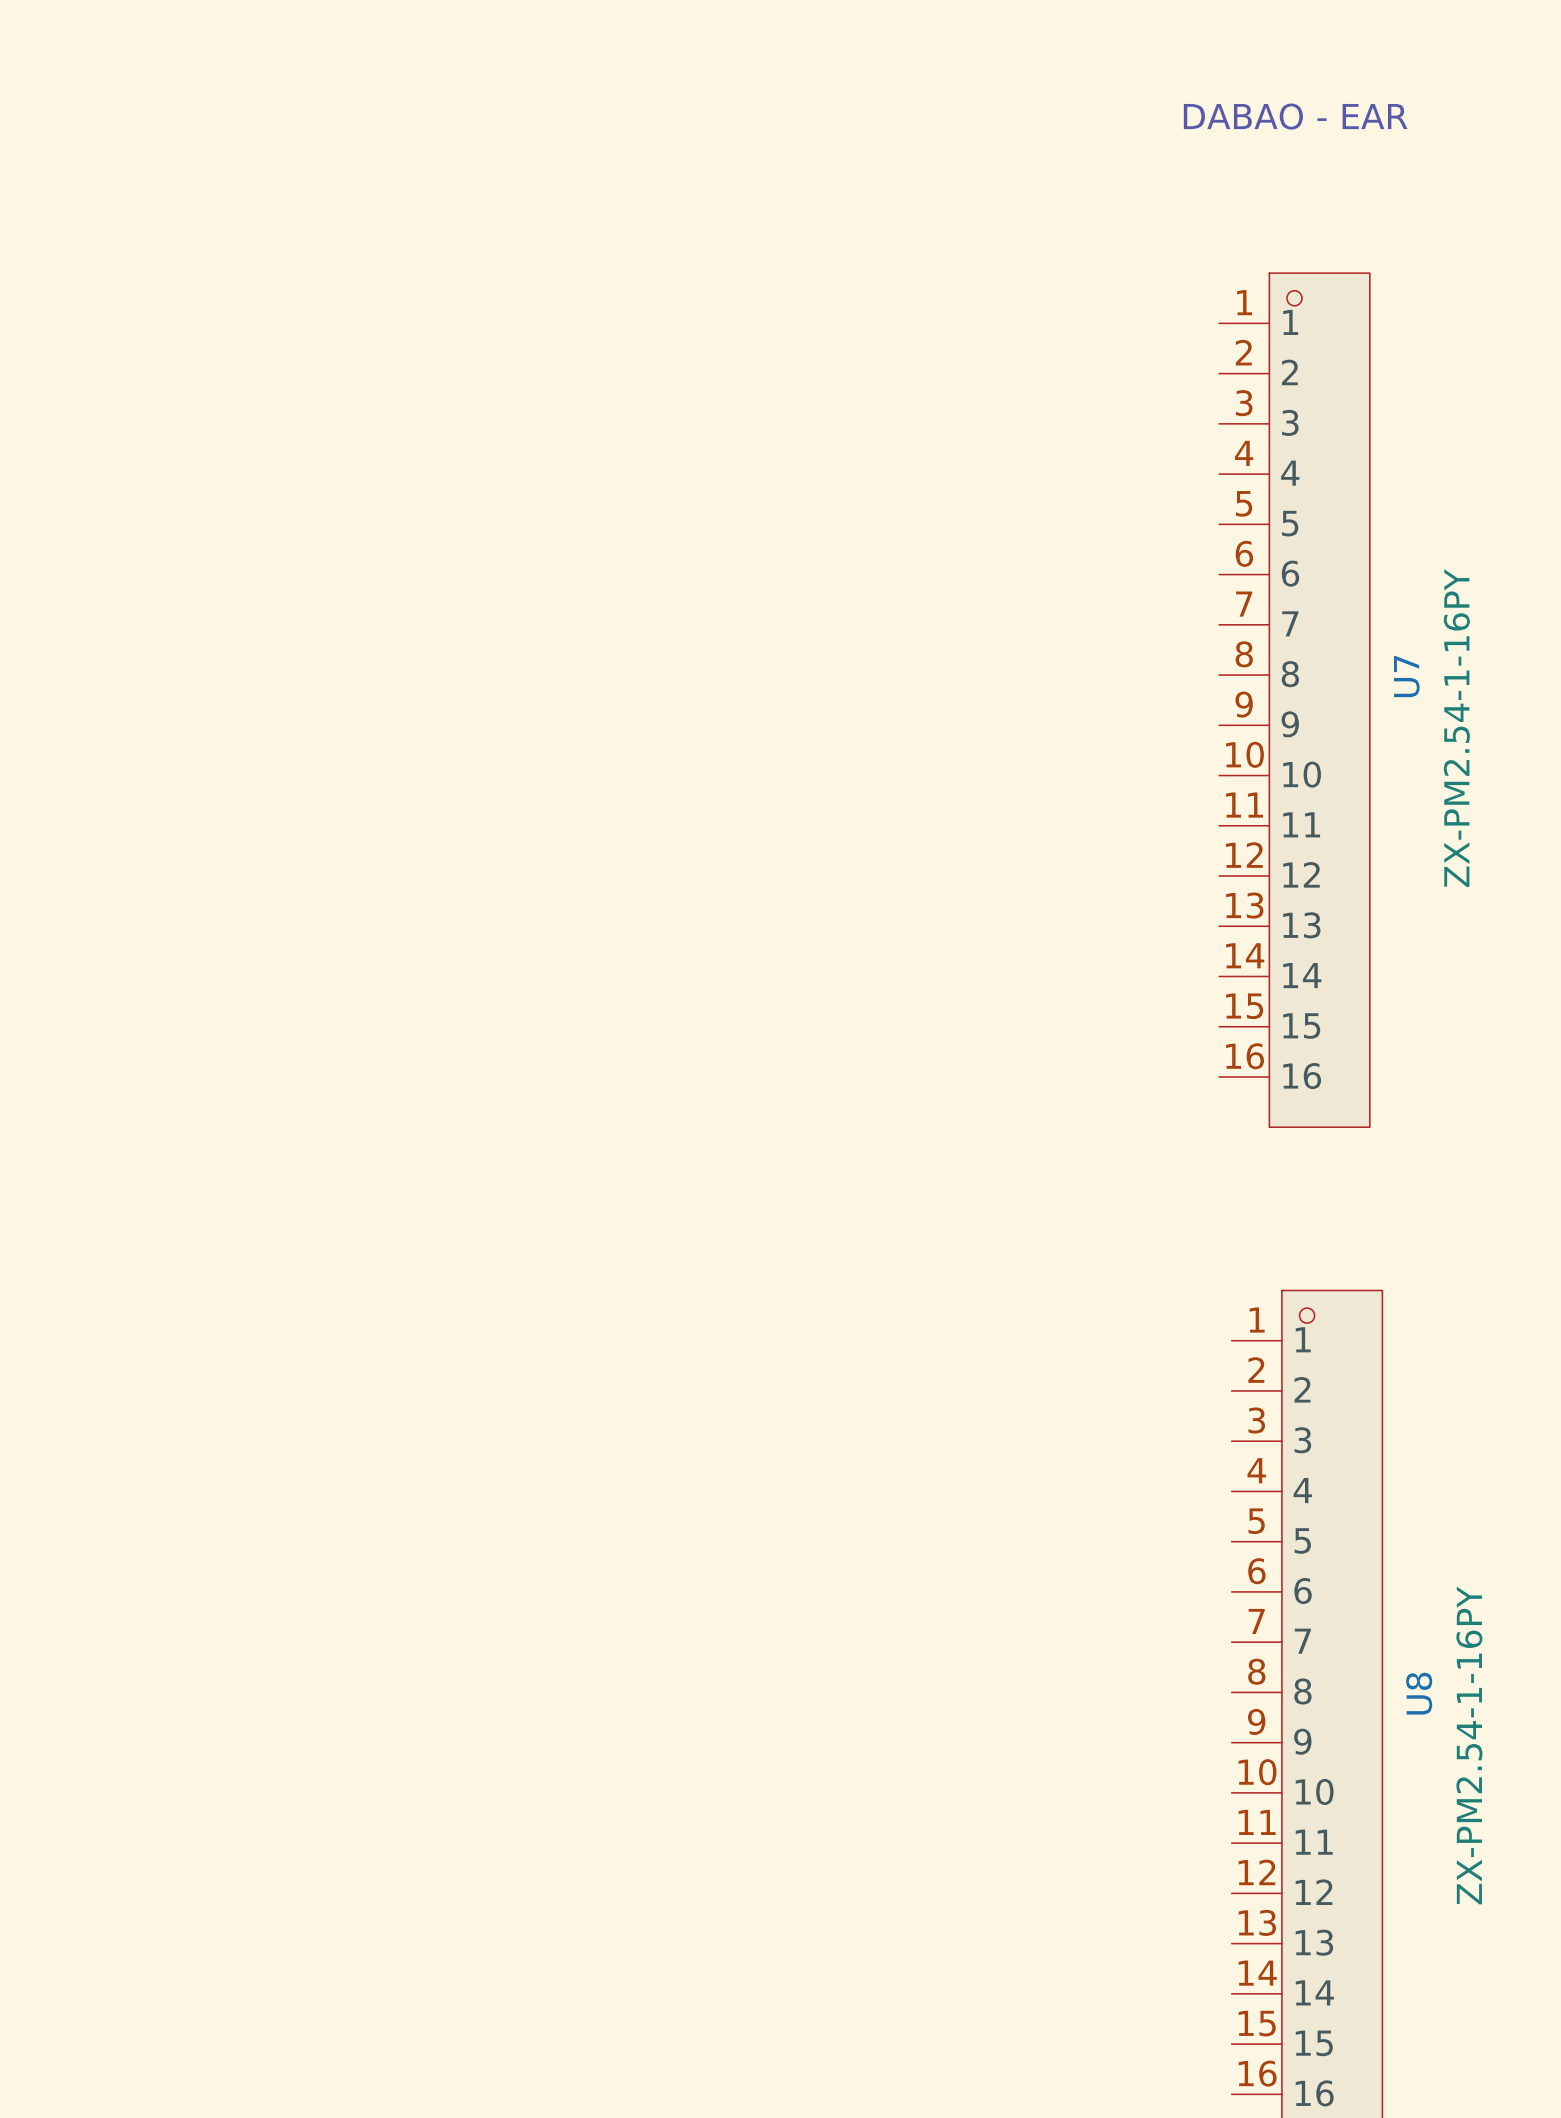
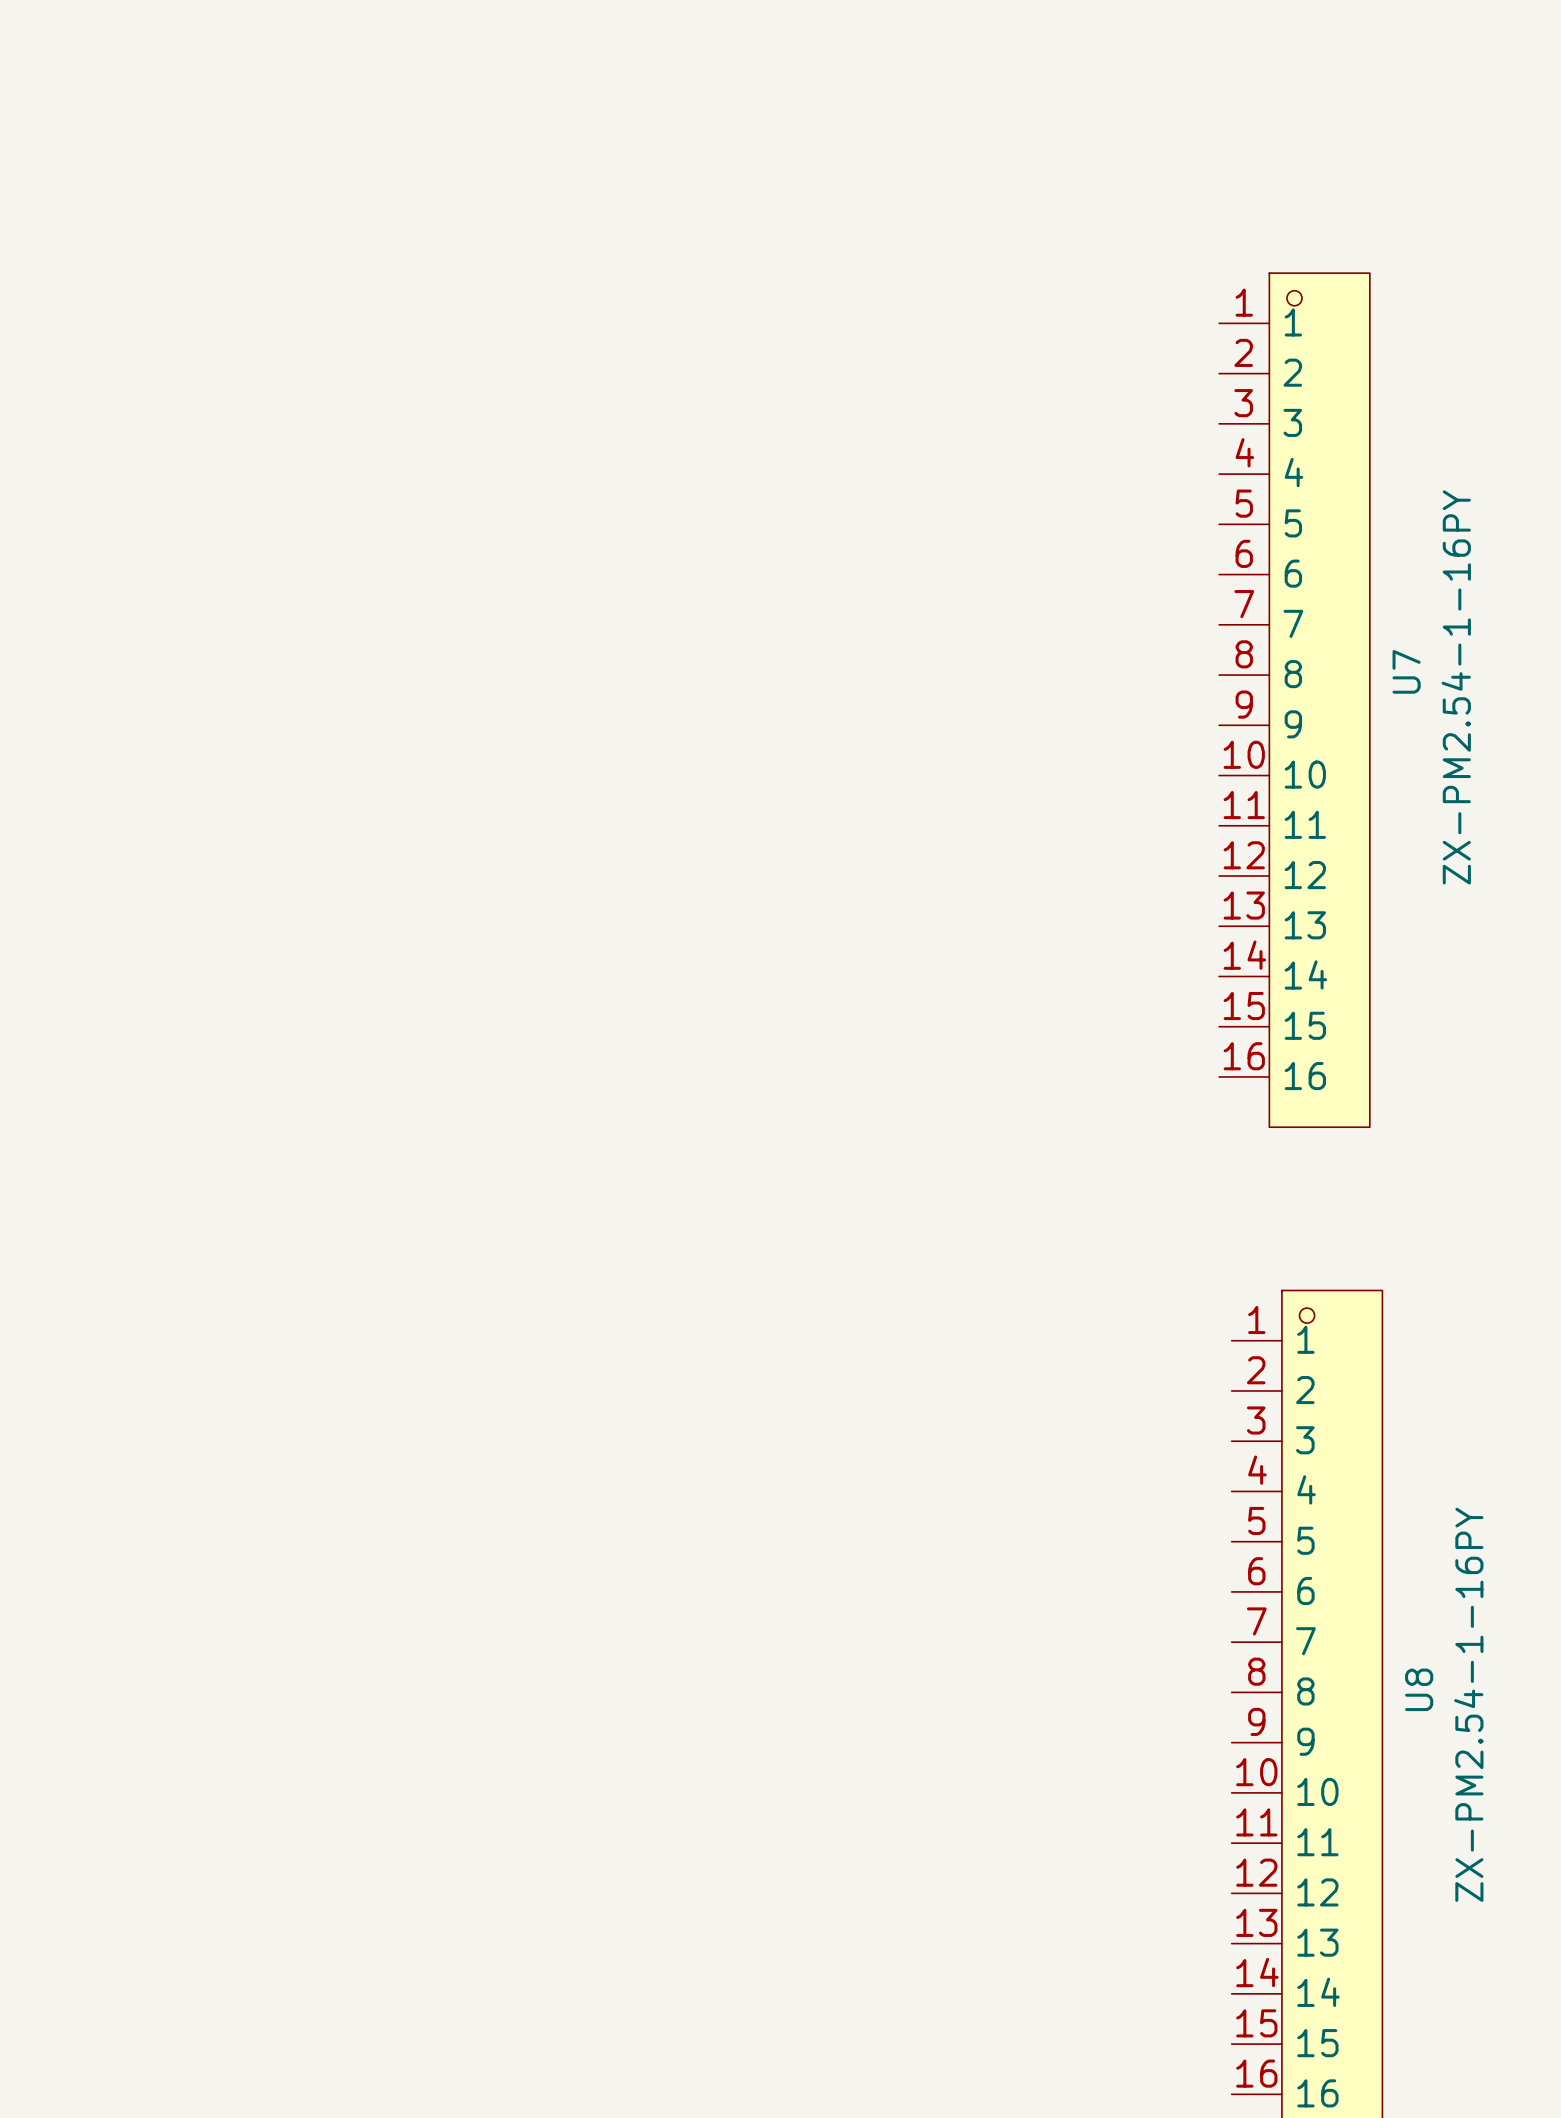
text: DABAO - EAR (1295, 116) -> none

